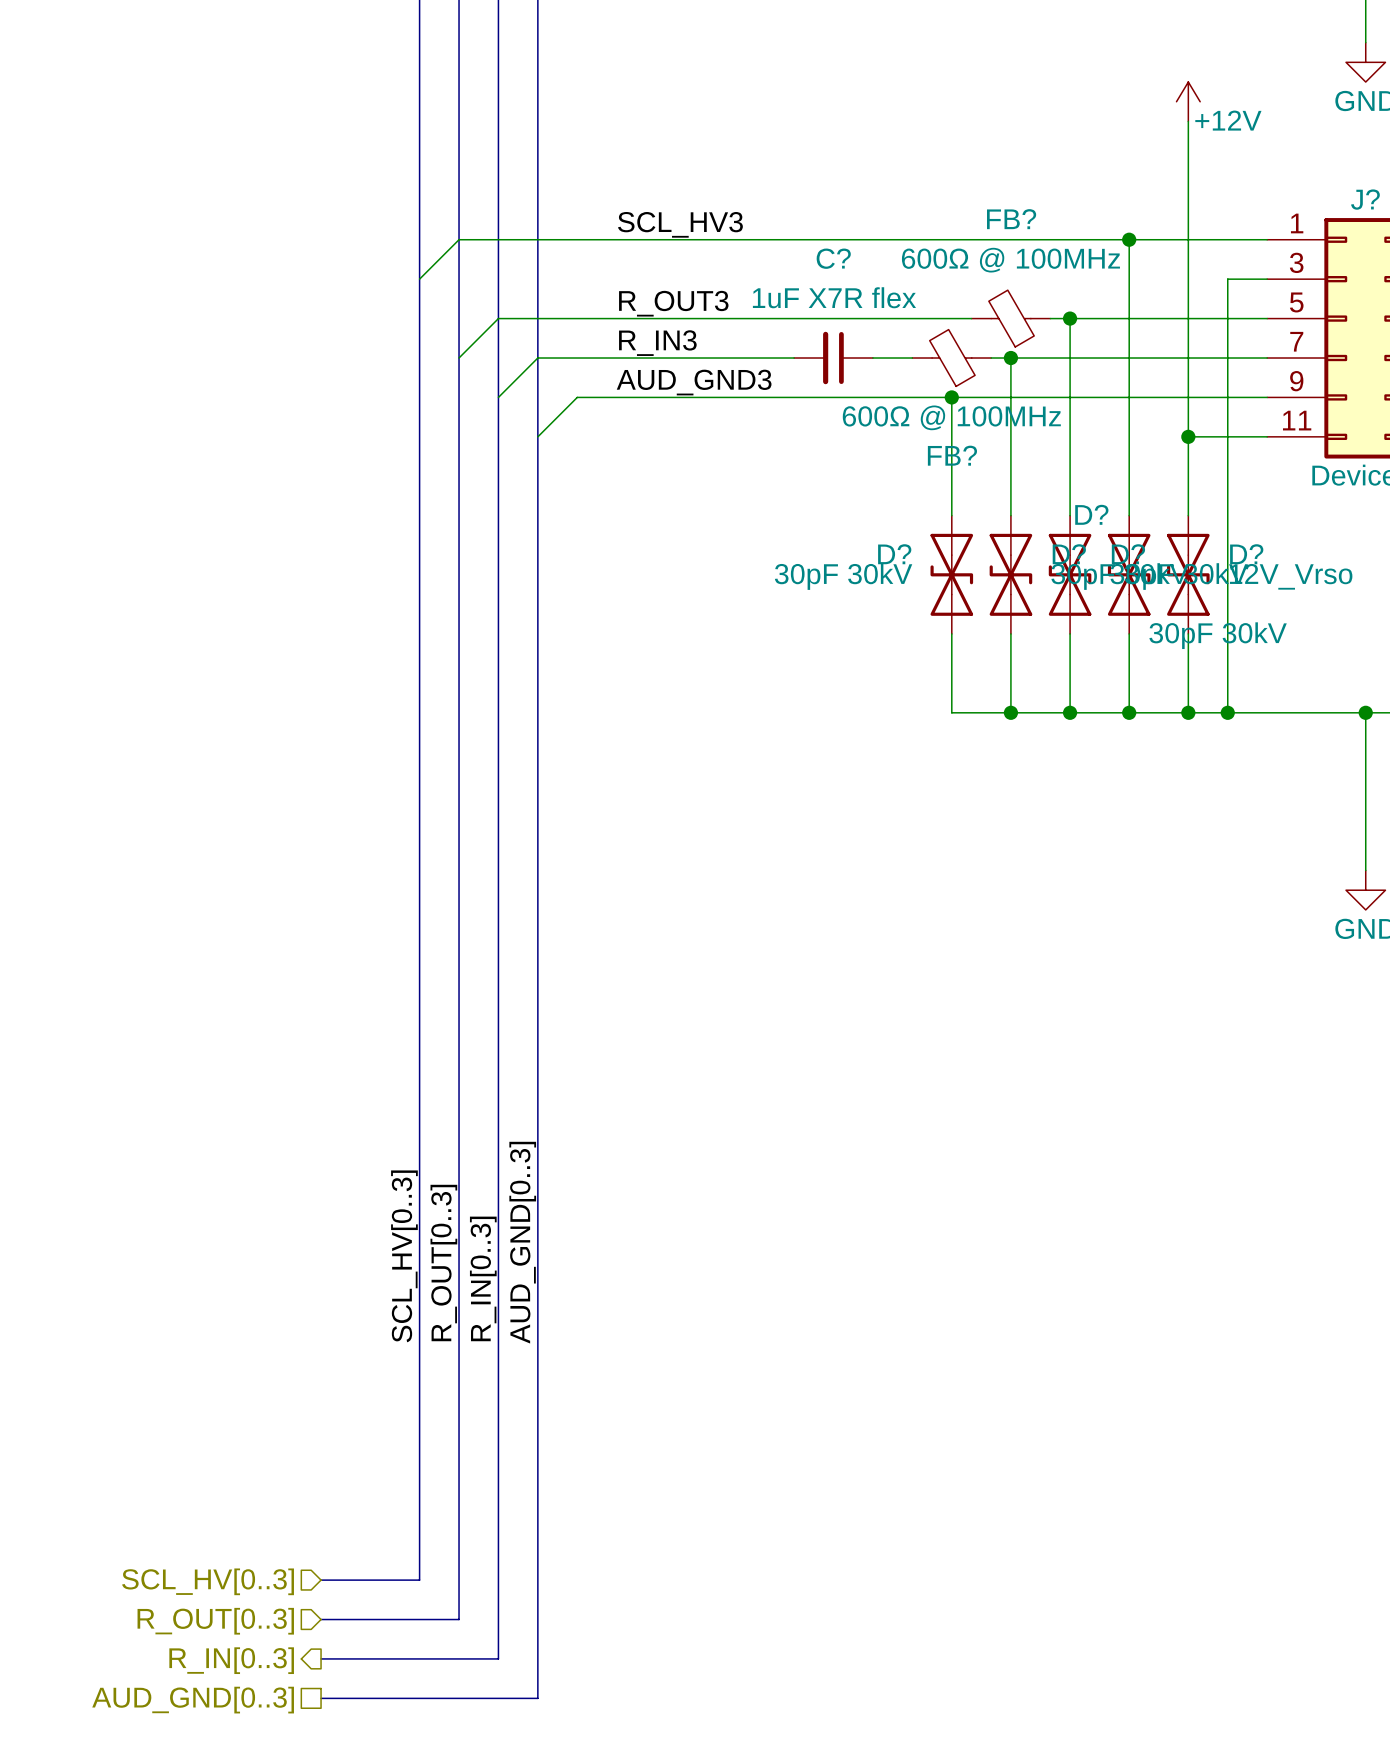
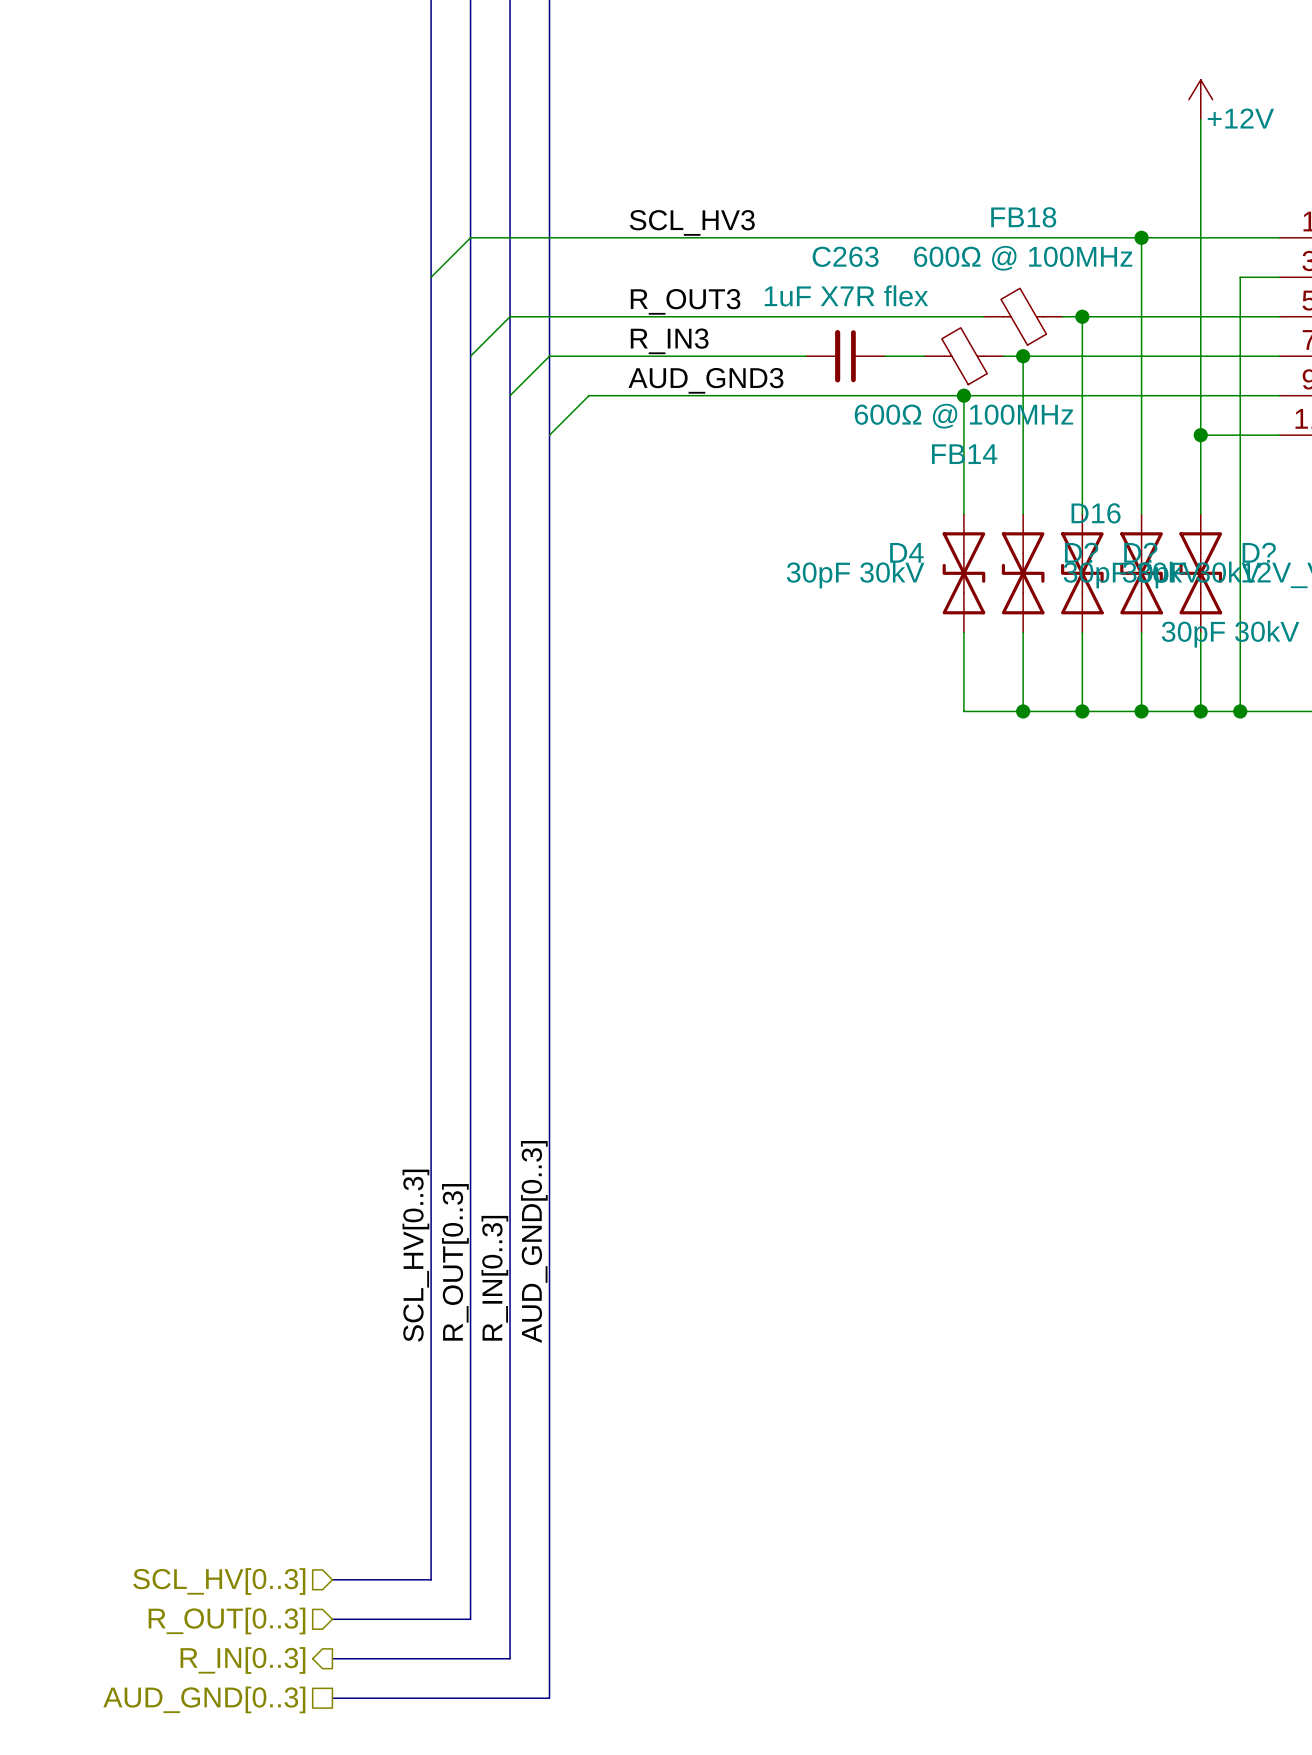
FB? name: FB? (1011, 219) -> FB18 (1023, 217)
C? name: C? (833, 258) -> C263 (845, 256)
FB? name: FB? (952, 455) -> FB14 (964, 454)
D? name: D? (1091, 514) -> D16 (1096, 513)
D? name: D? (894, 554) -> D4 (906, 552)

